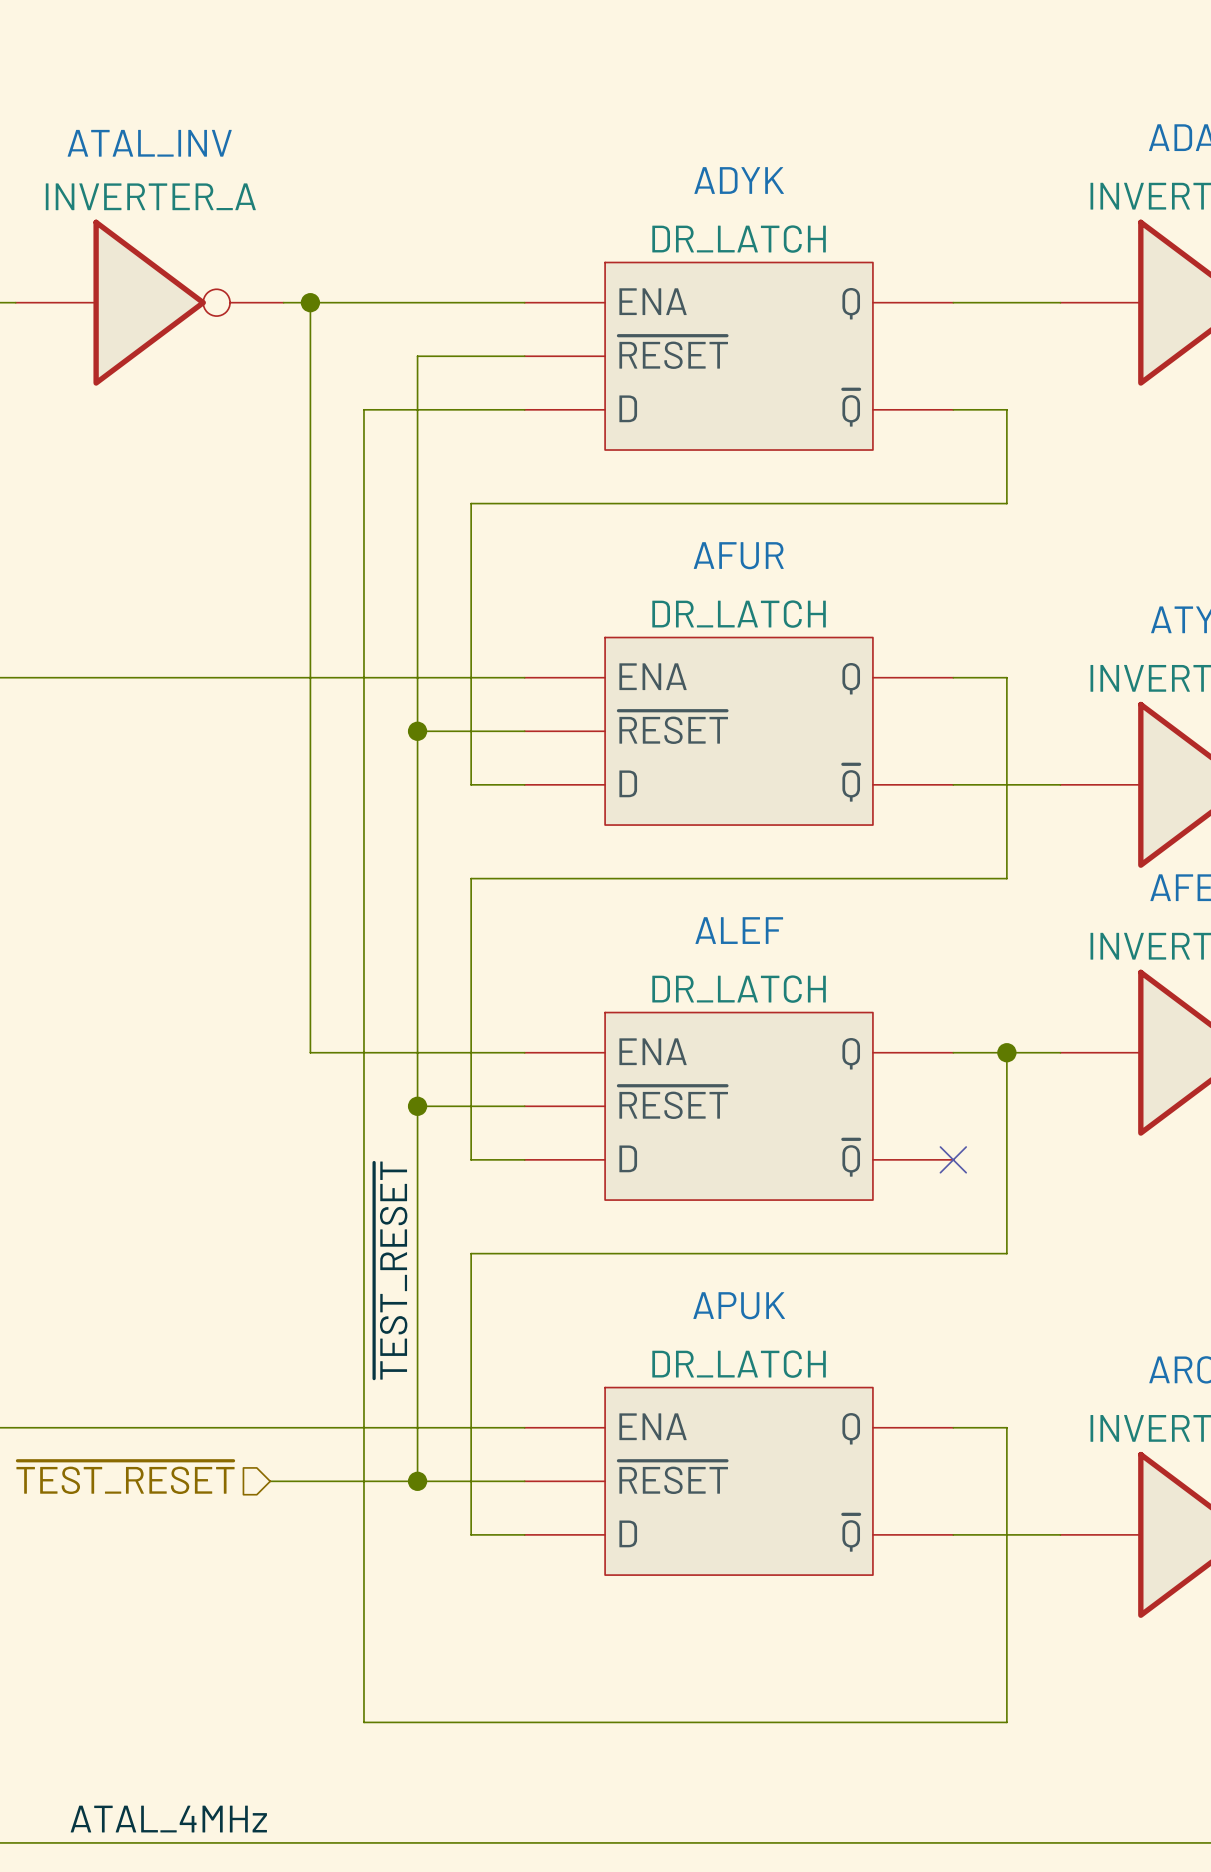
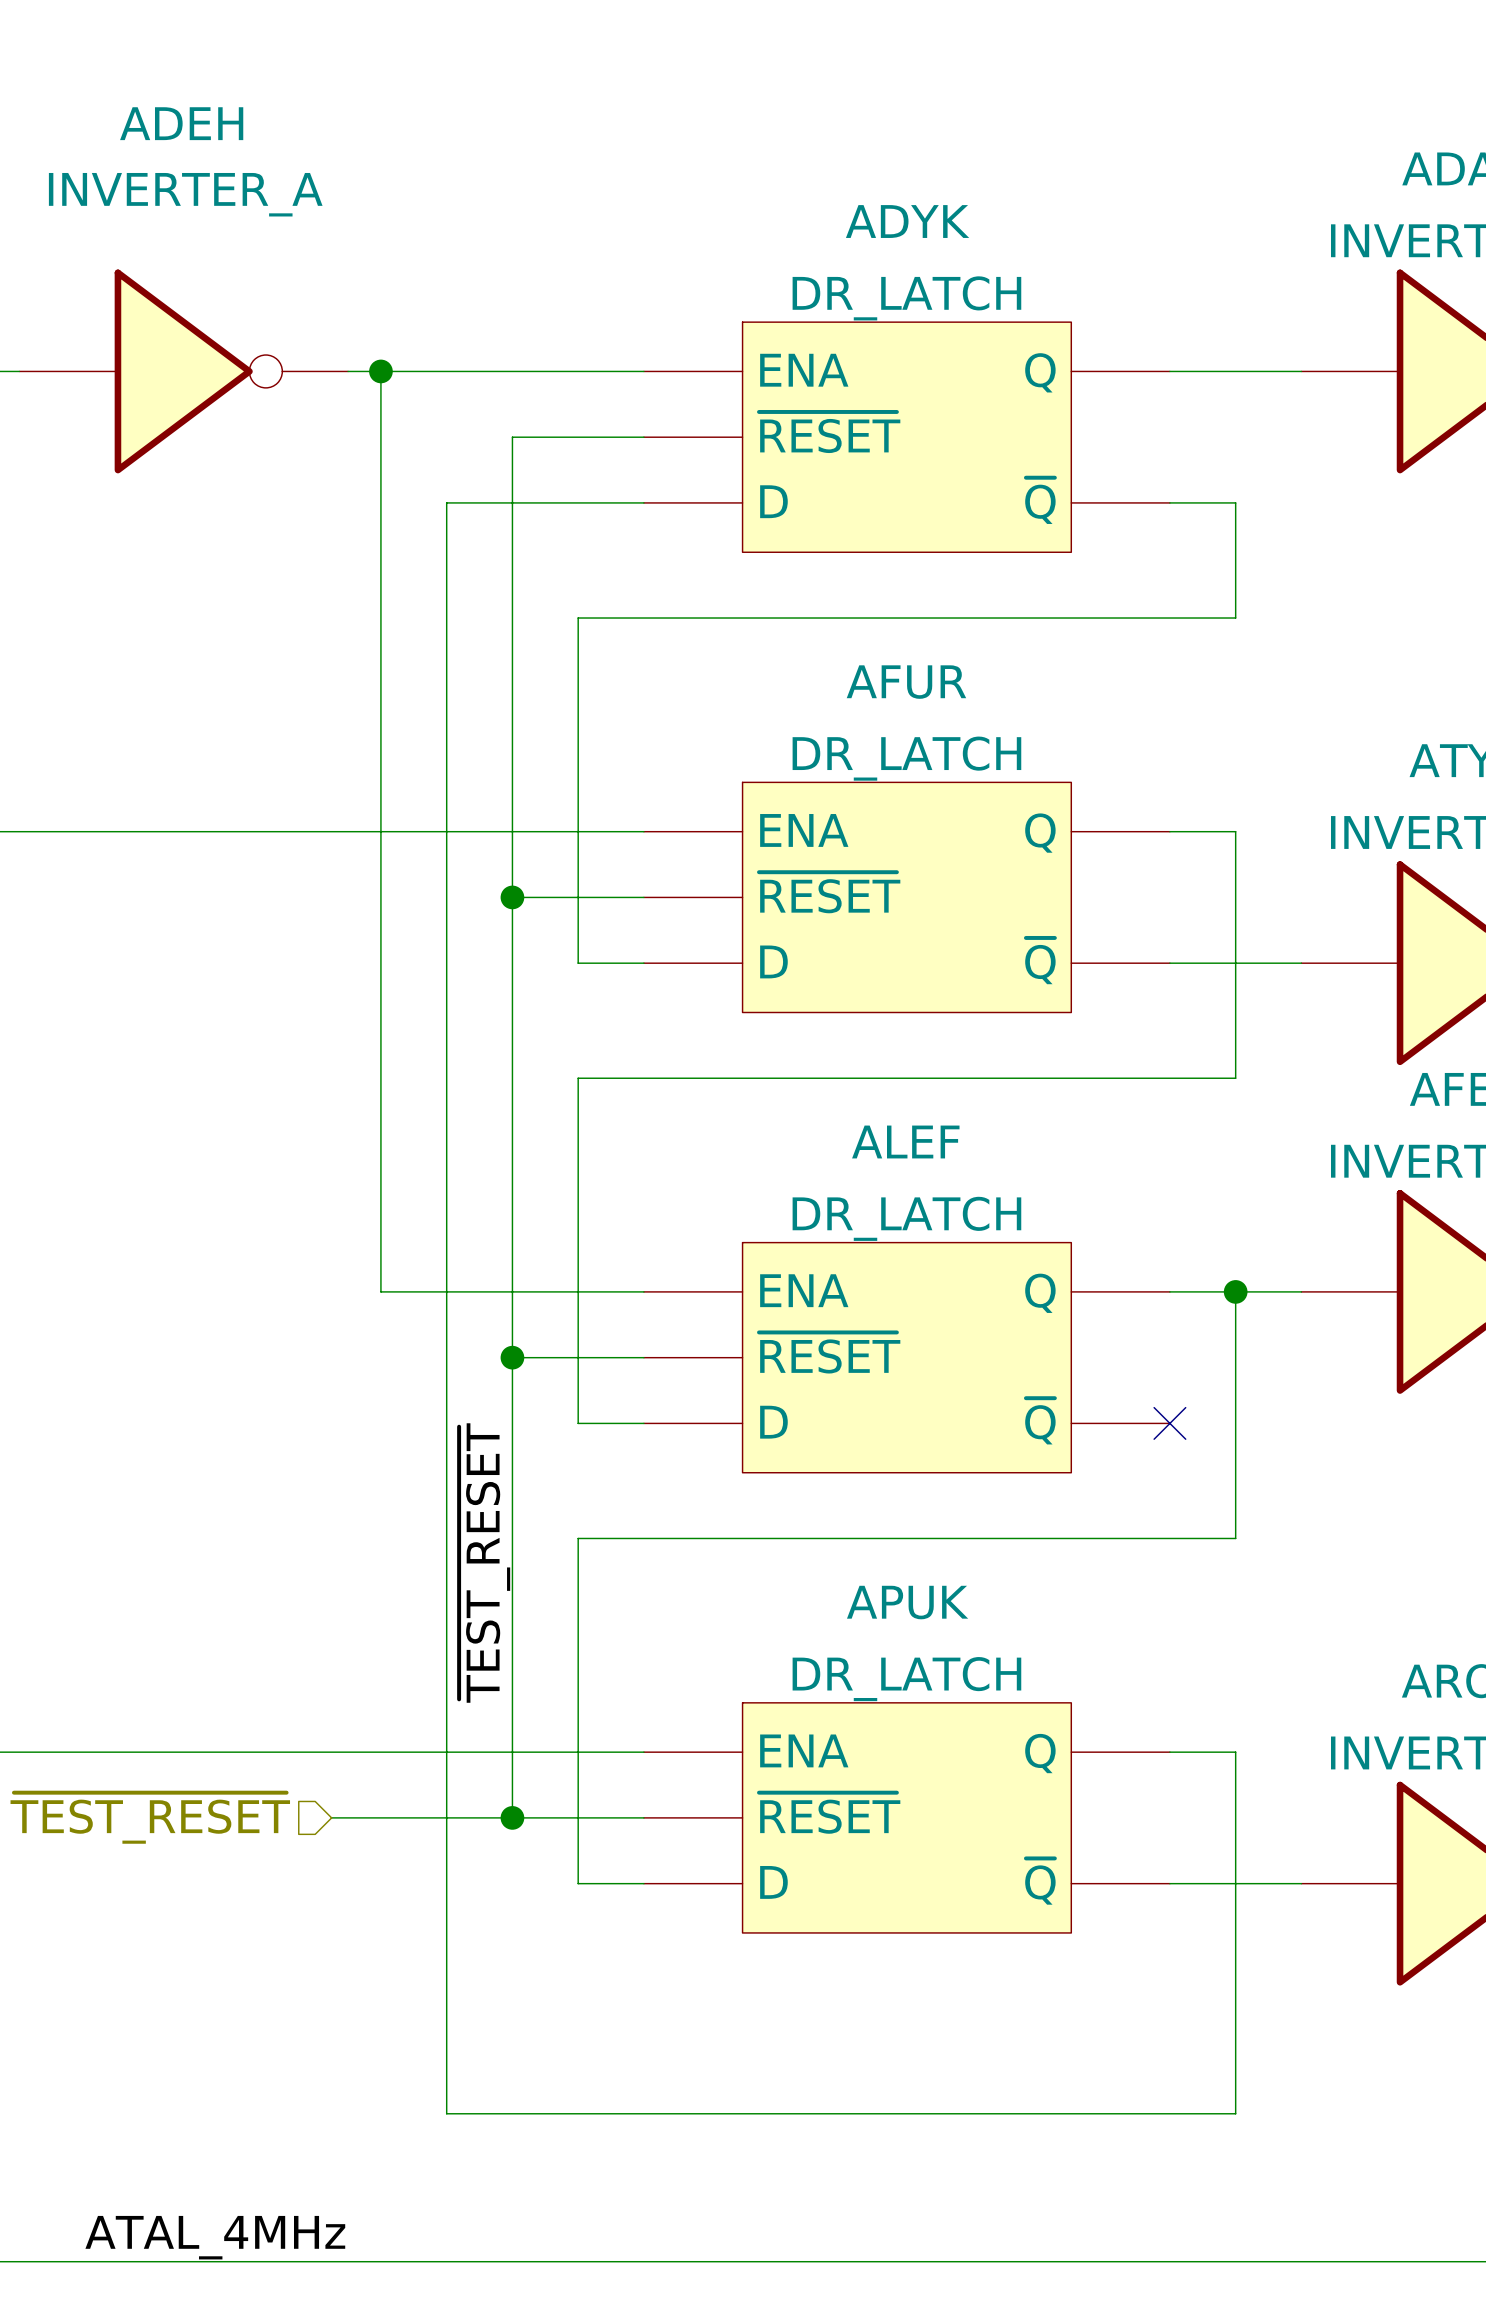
ATAL_INV name: ATAL_INV (149, 143) -> ADEH (181, 123)
ATAL_INV value position: INVERTER_A (150, 196) -> INVERTER_A (185, 194)

